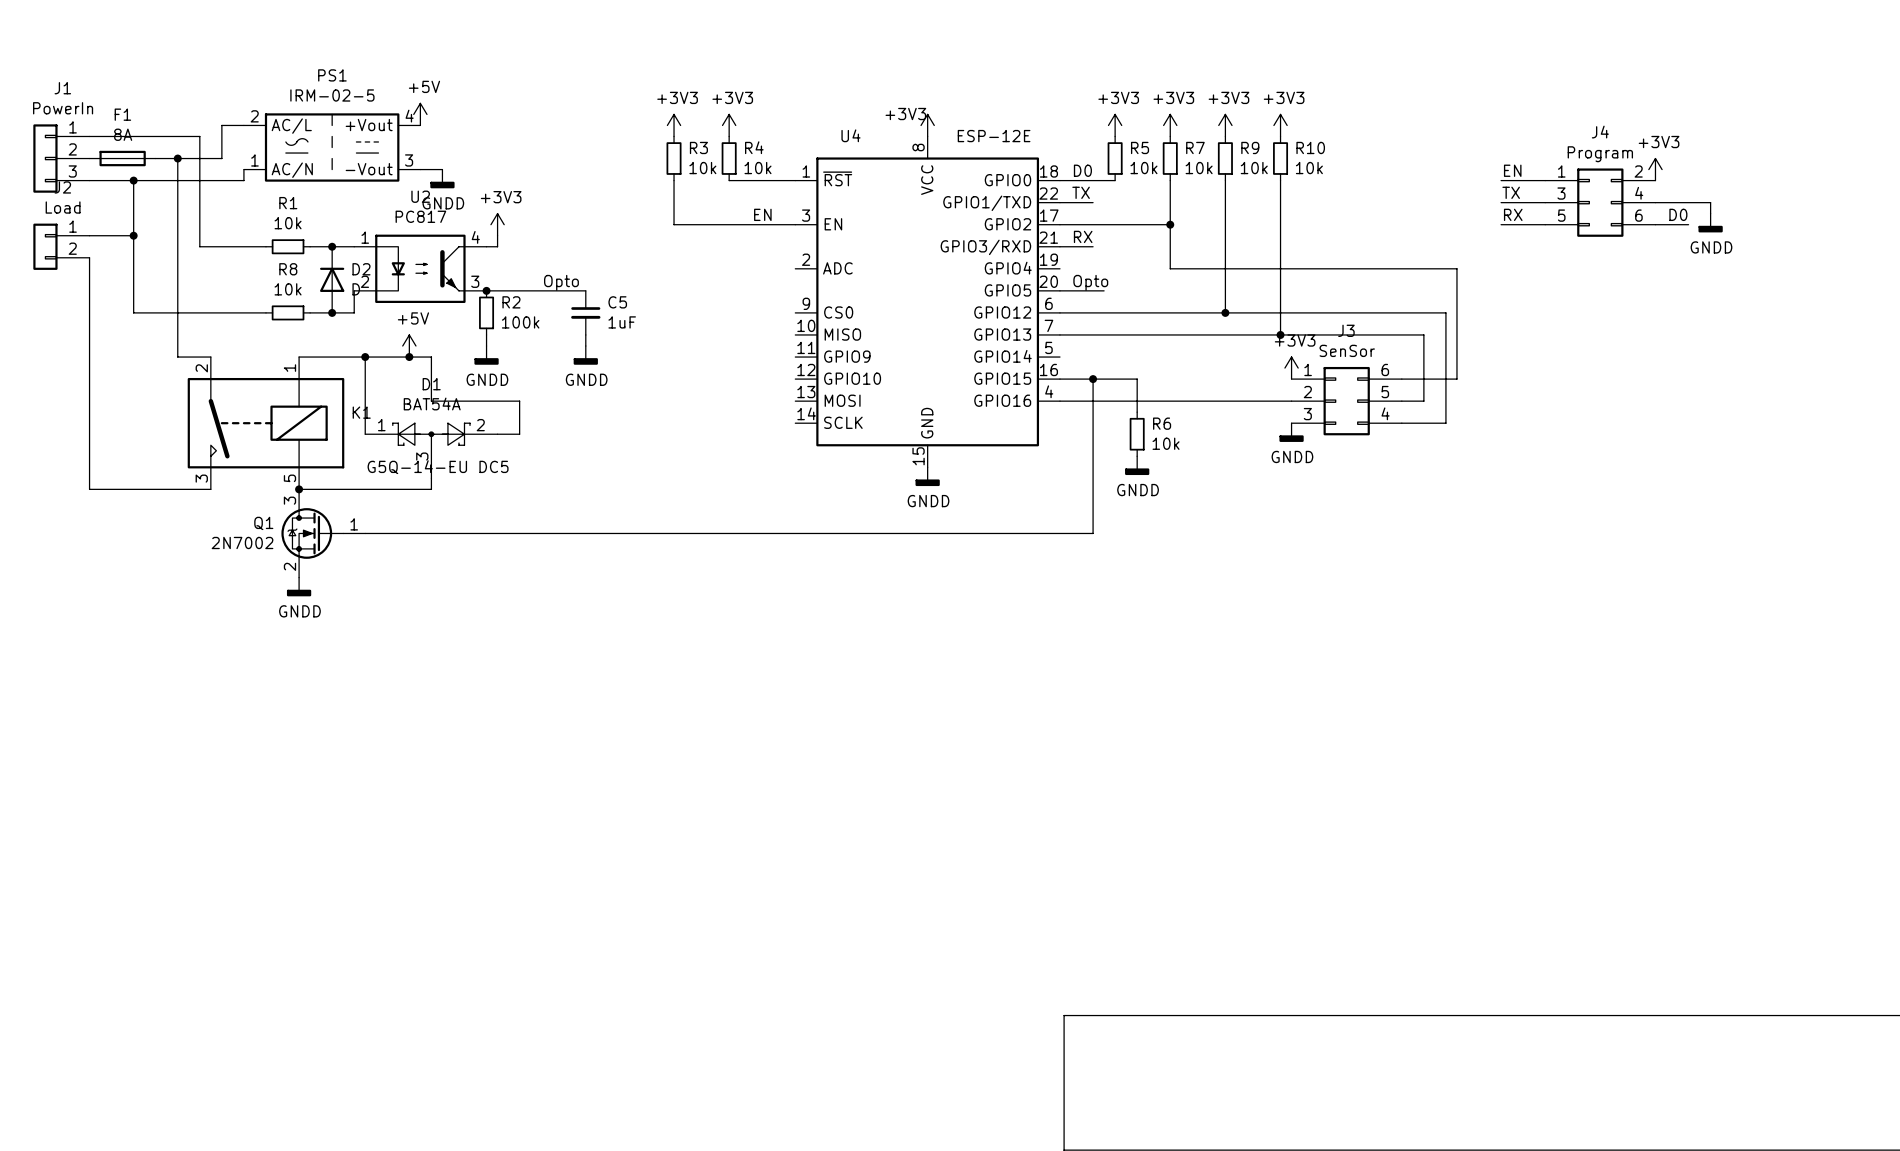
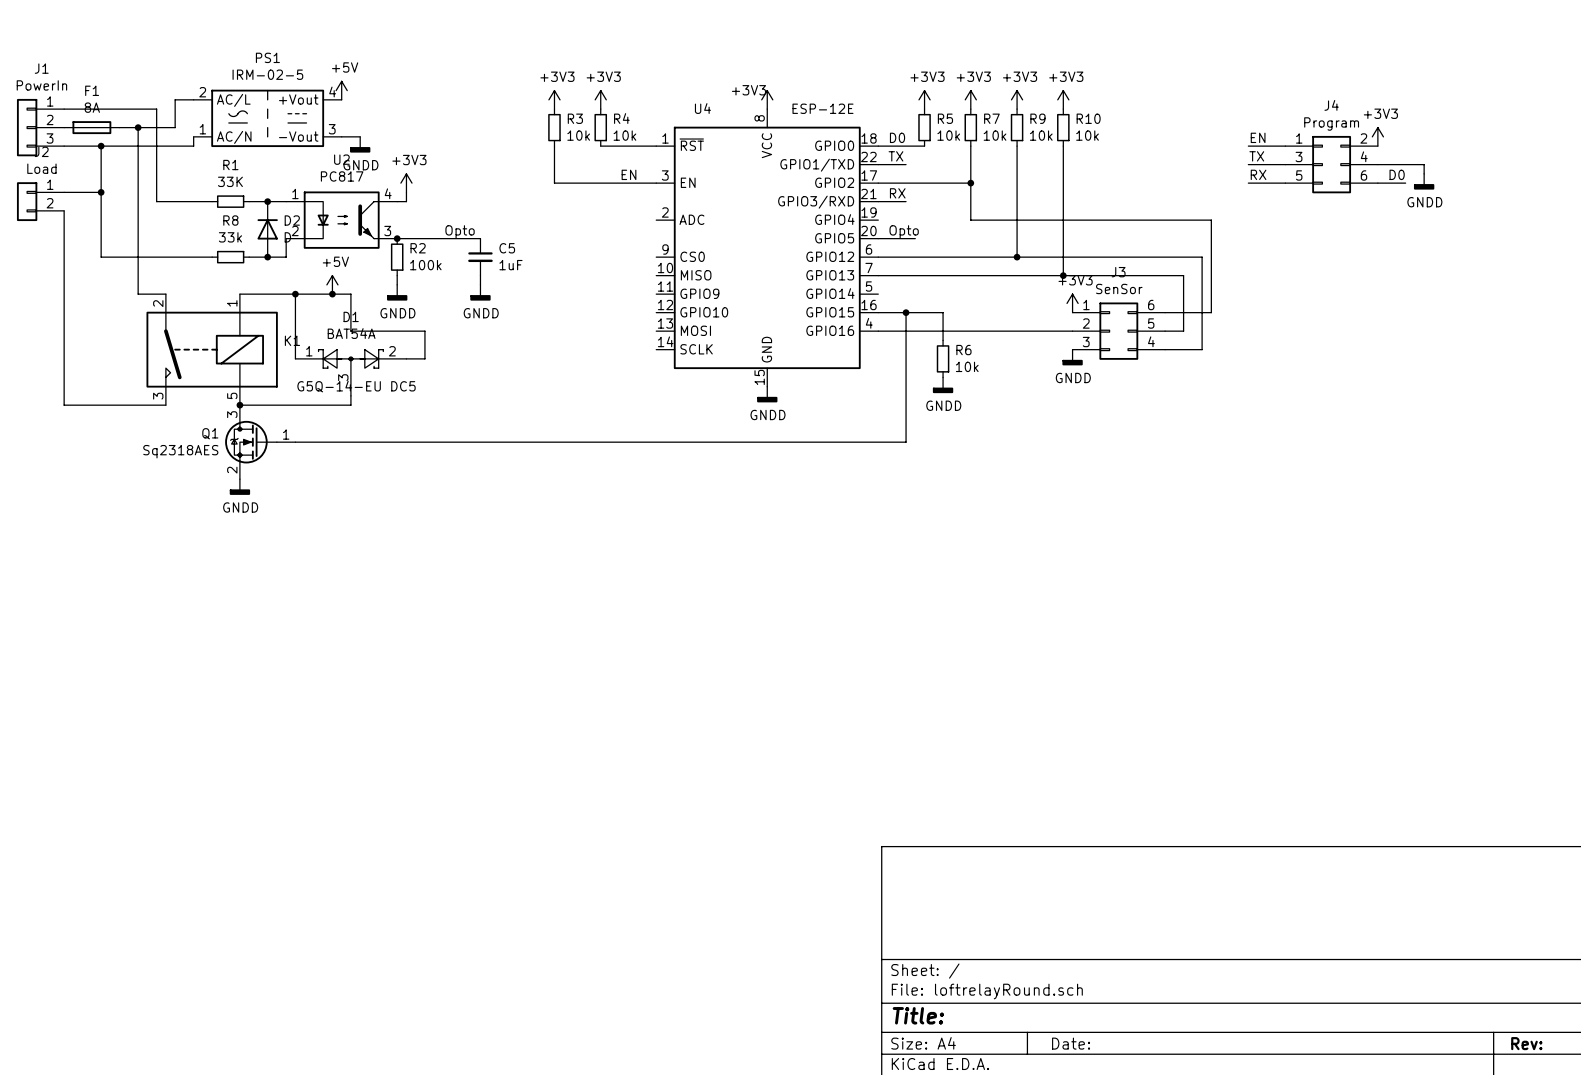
R1 value: 10k (288, 223) -> 33K (230, 181)
R8 value: 10k (288, 289) -> 33k (230, 237)
Q1 value: 2N7002 (242, 542) -> Sq2318AES (180, 451)

